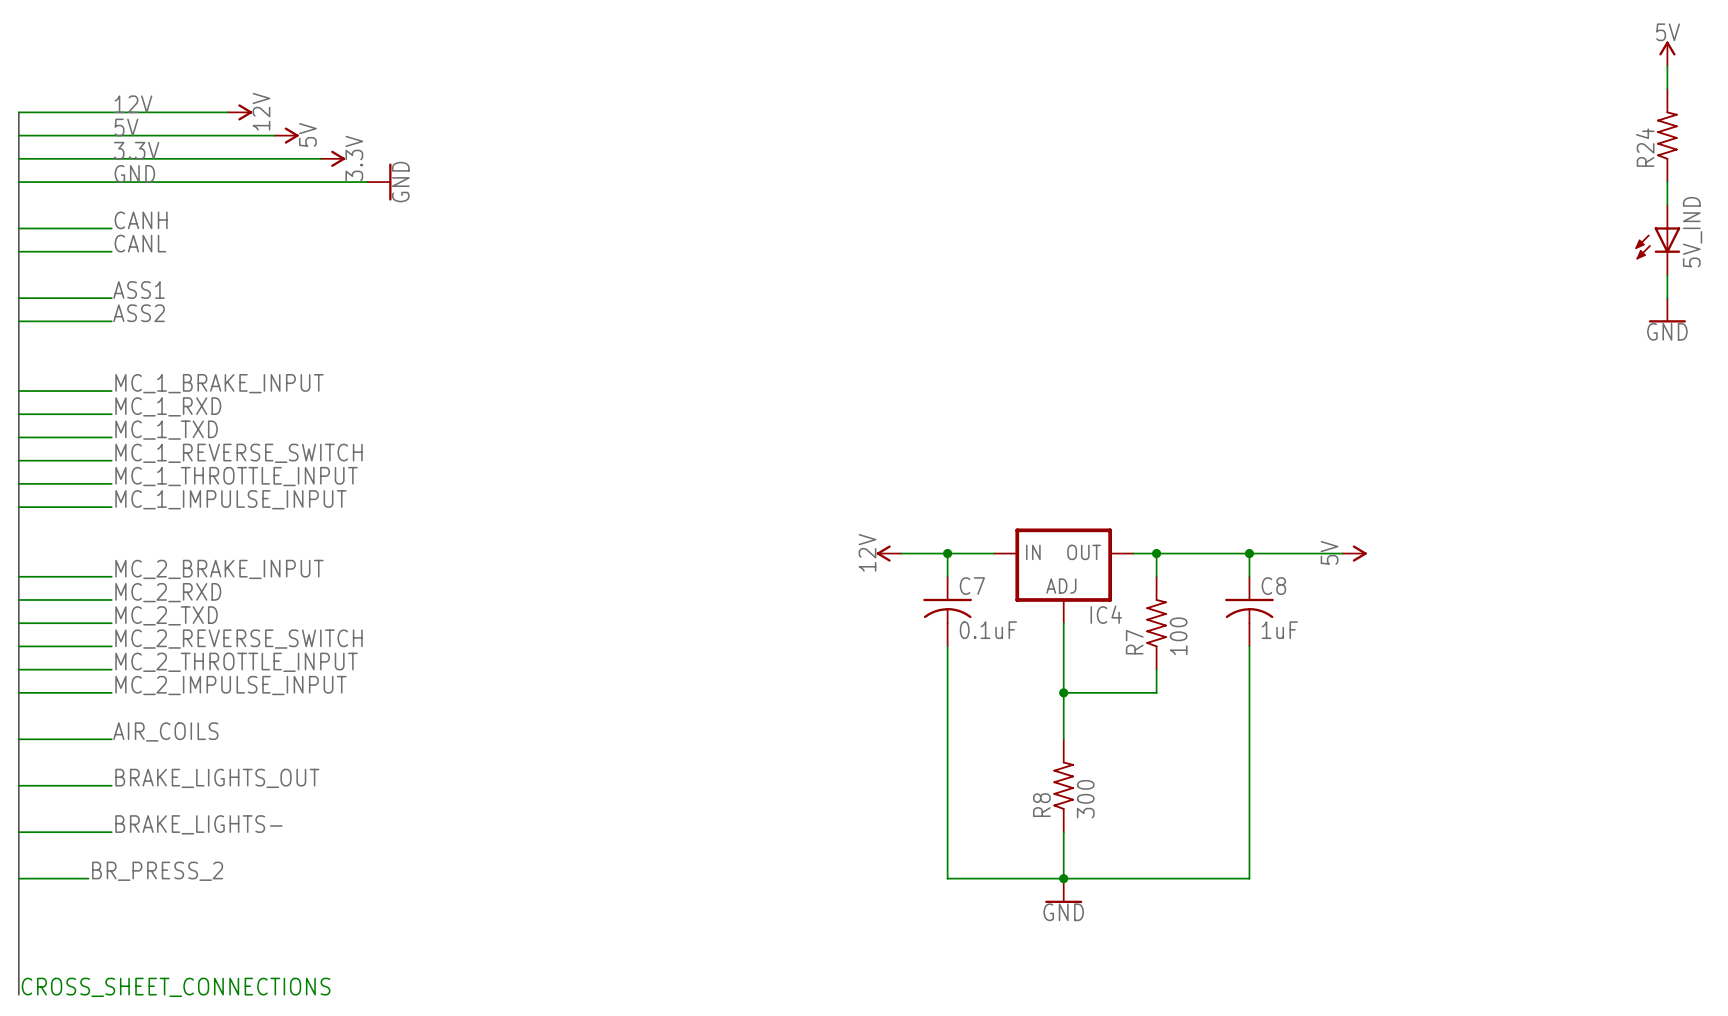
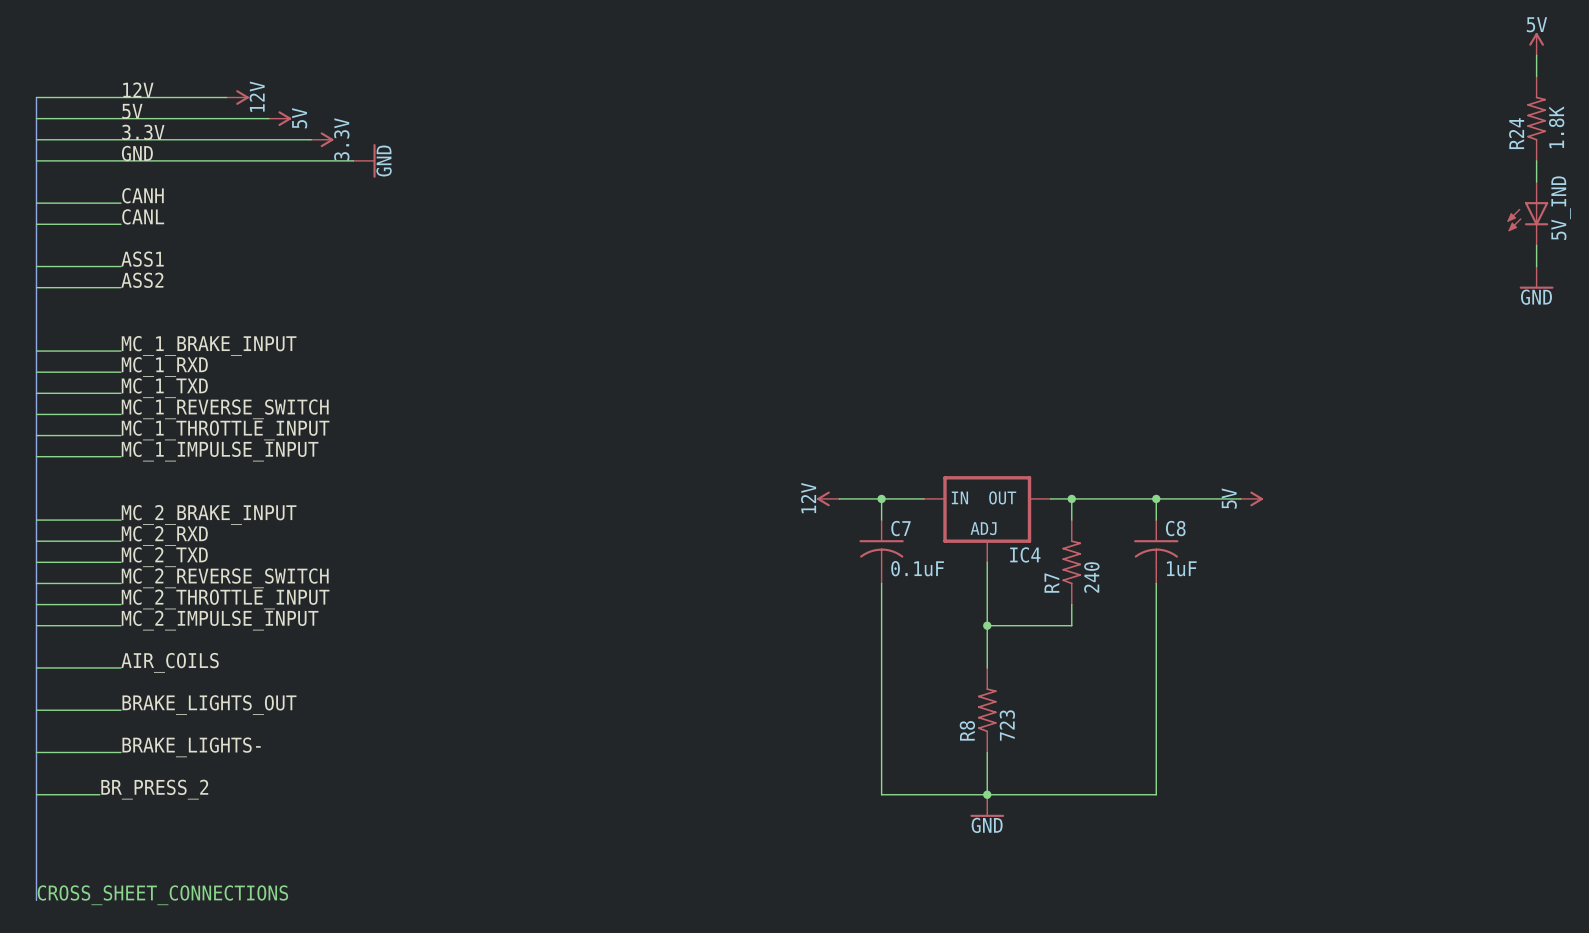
R24 value: none -> 1.8K (1556, 127)
R7 value: 100 (1178, 636) -> 240 (1091, 577)
R8 value: 300 (1085, 799) -> 723 (1007, 725)

